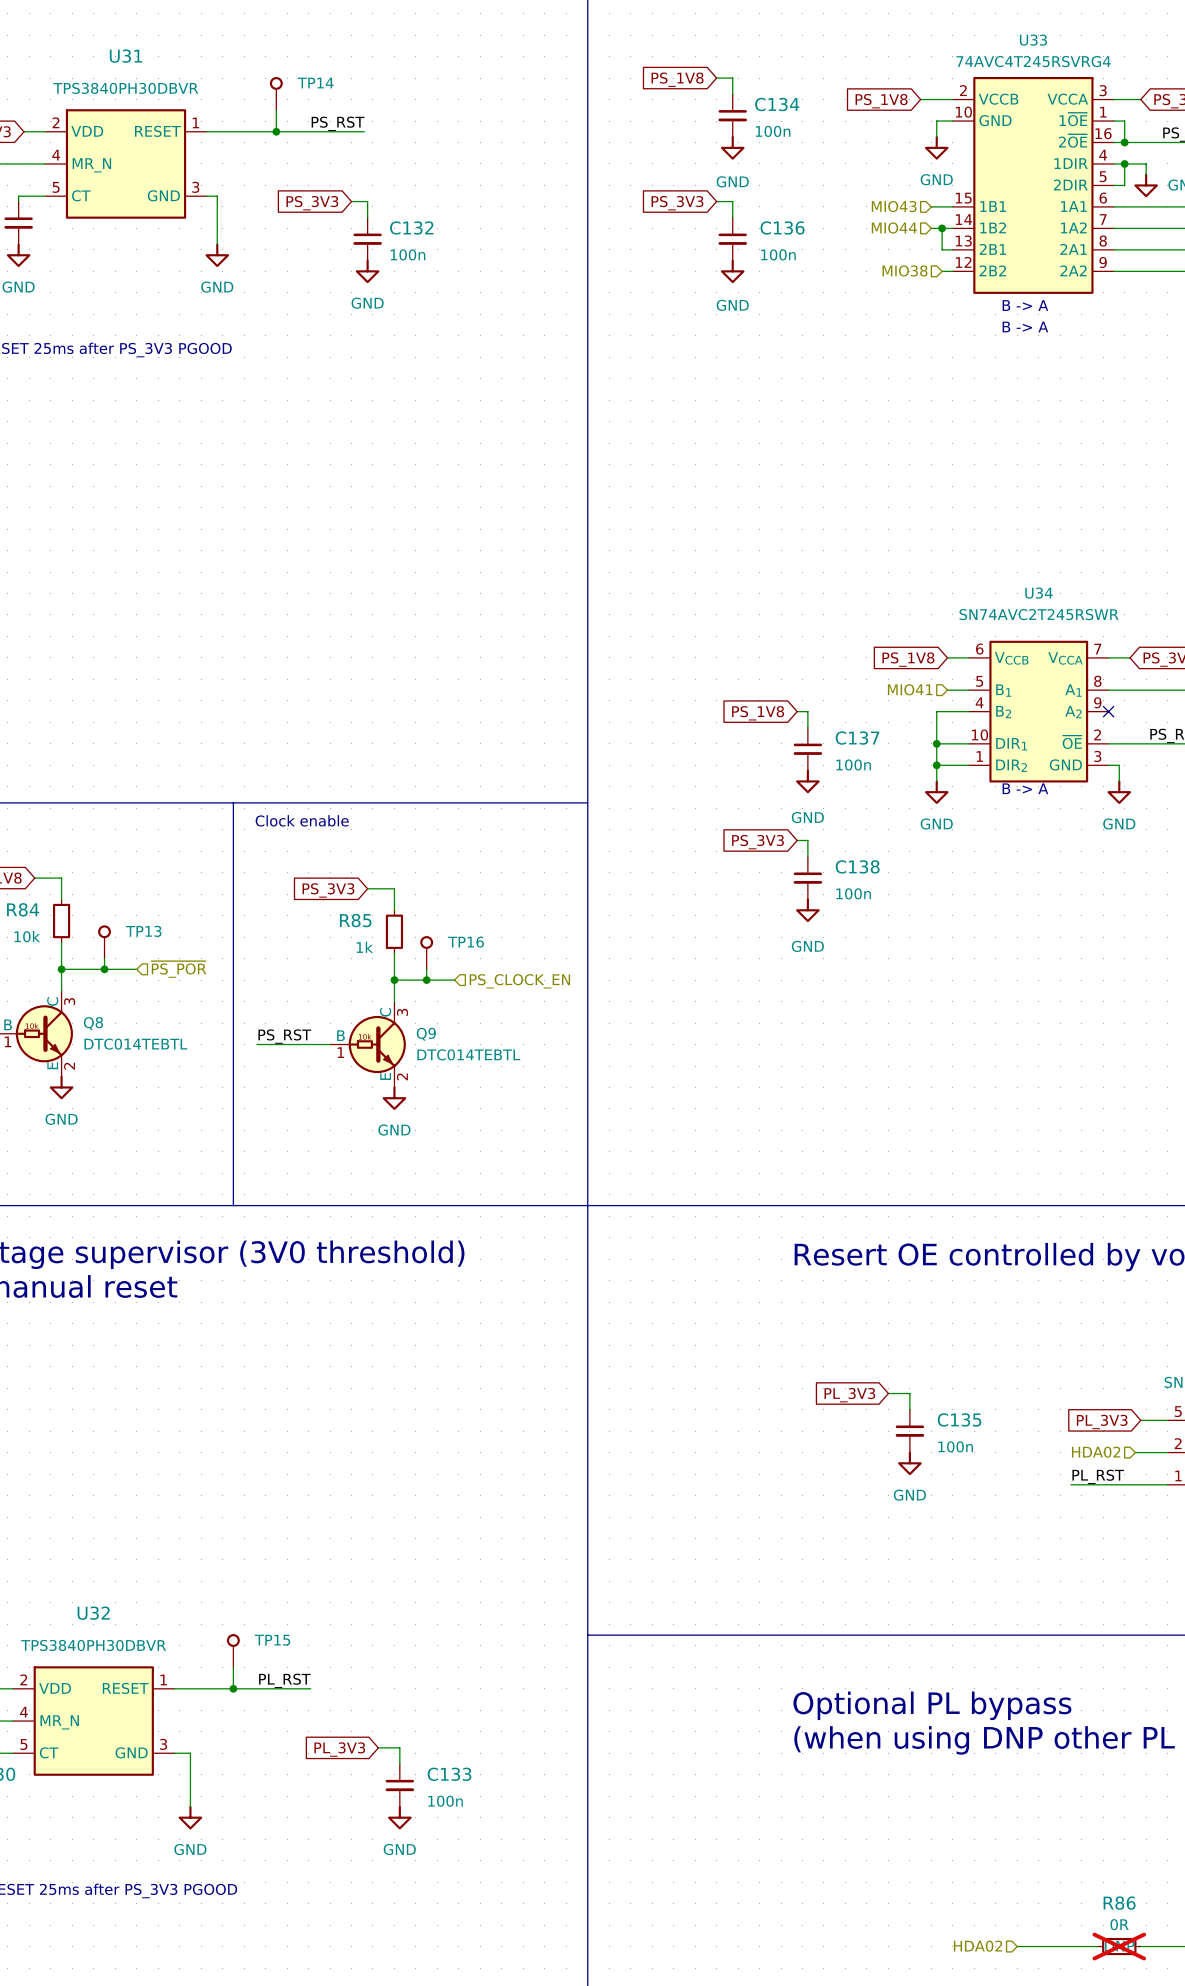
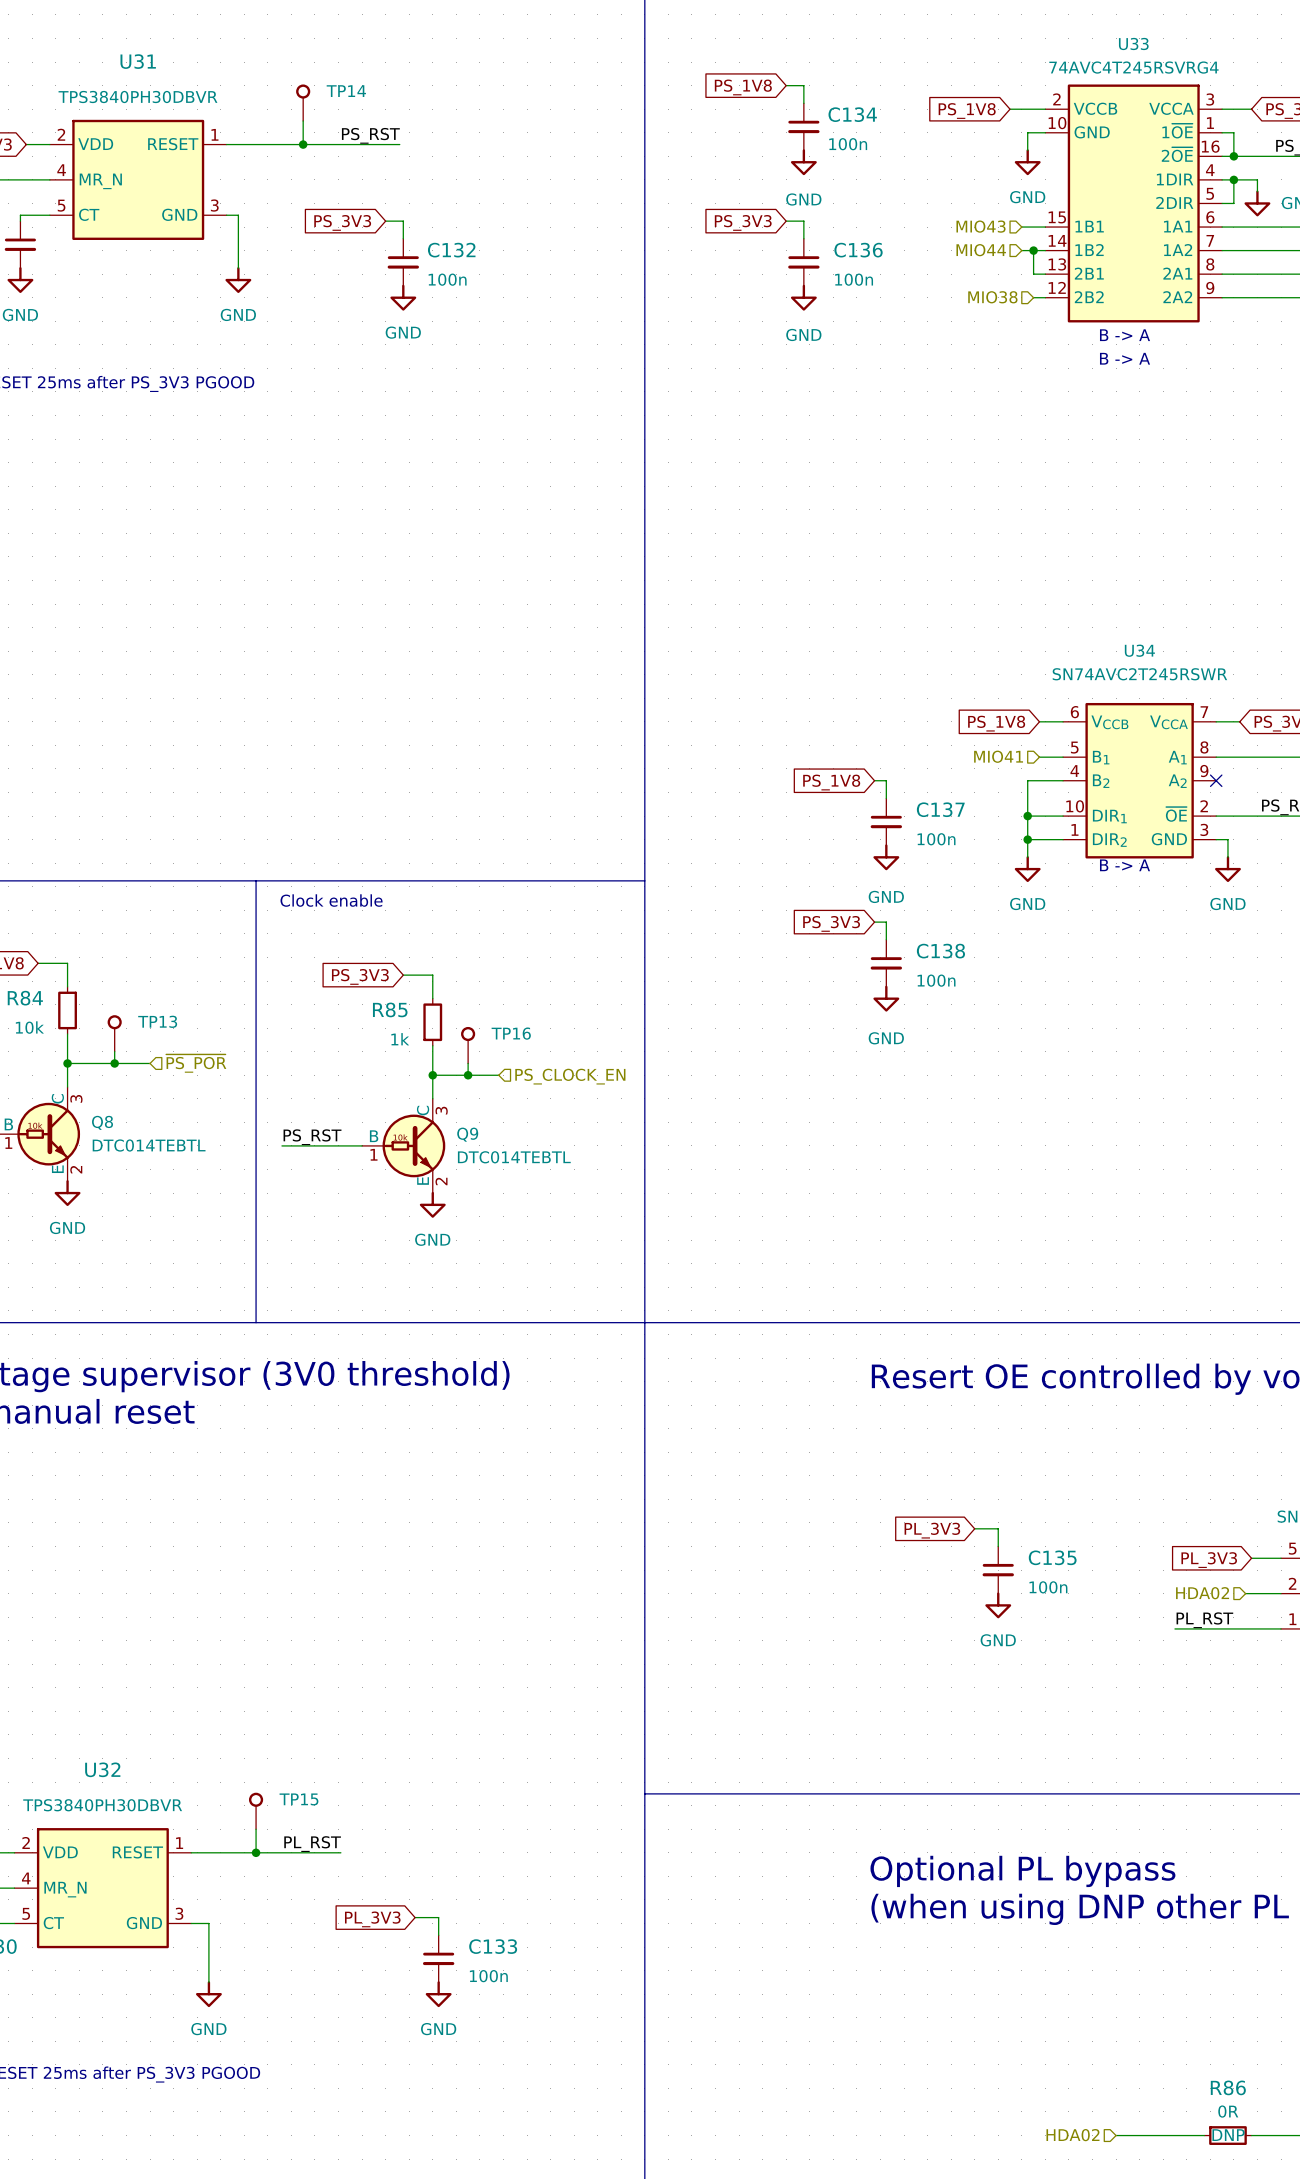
R86 do-not-place cross: (1119, 1946) -> none

